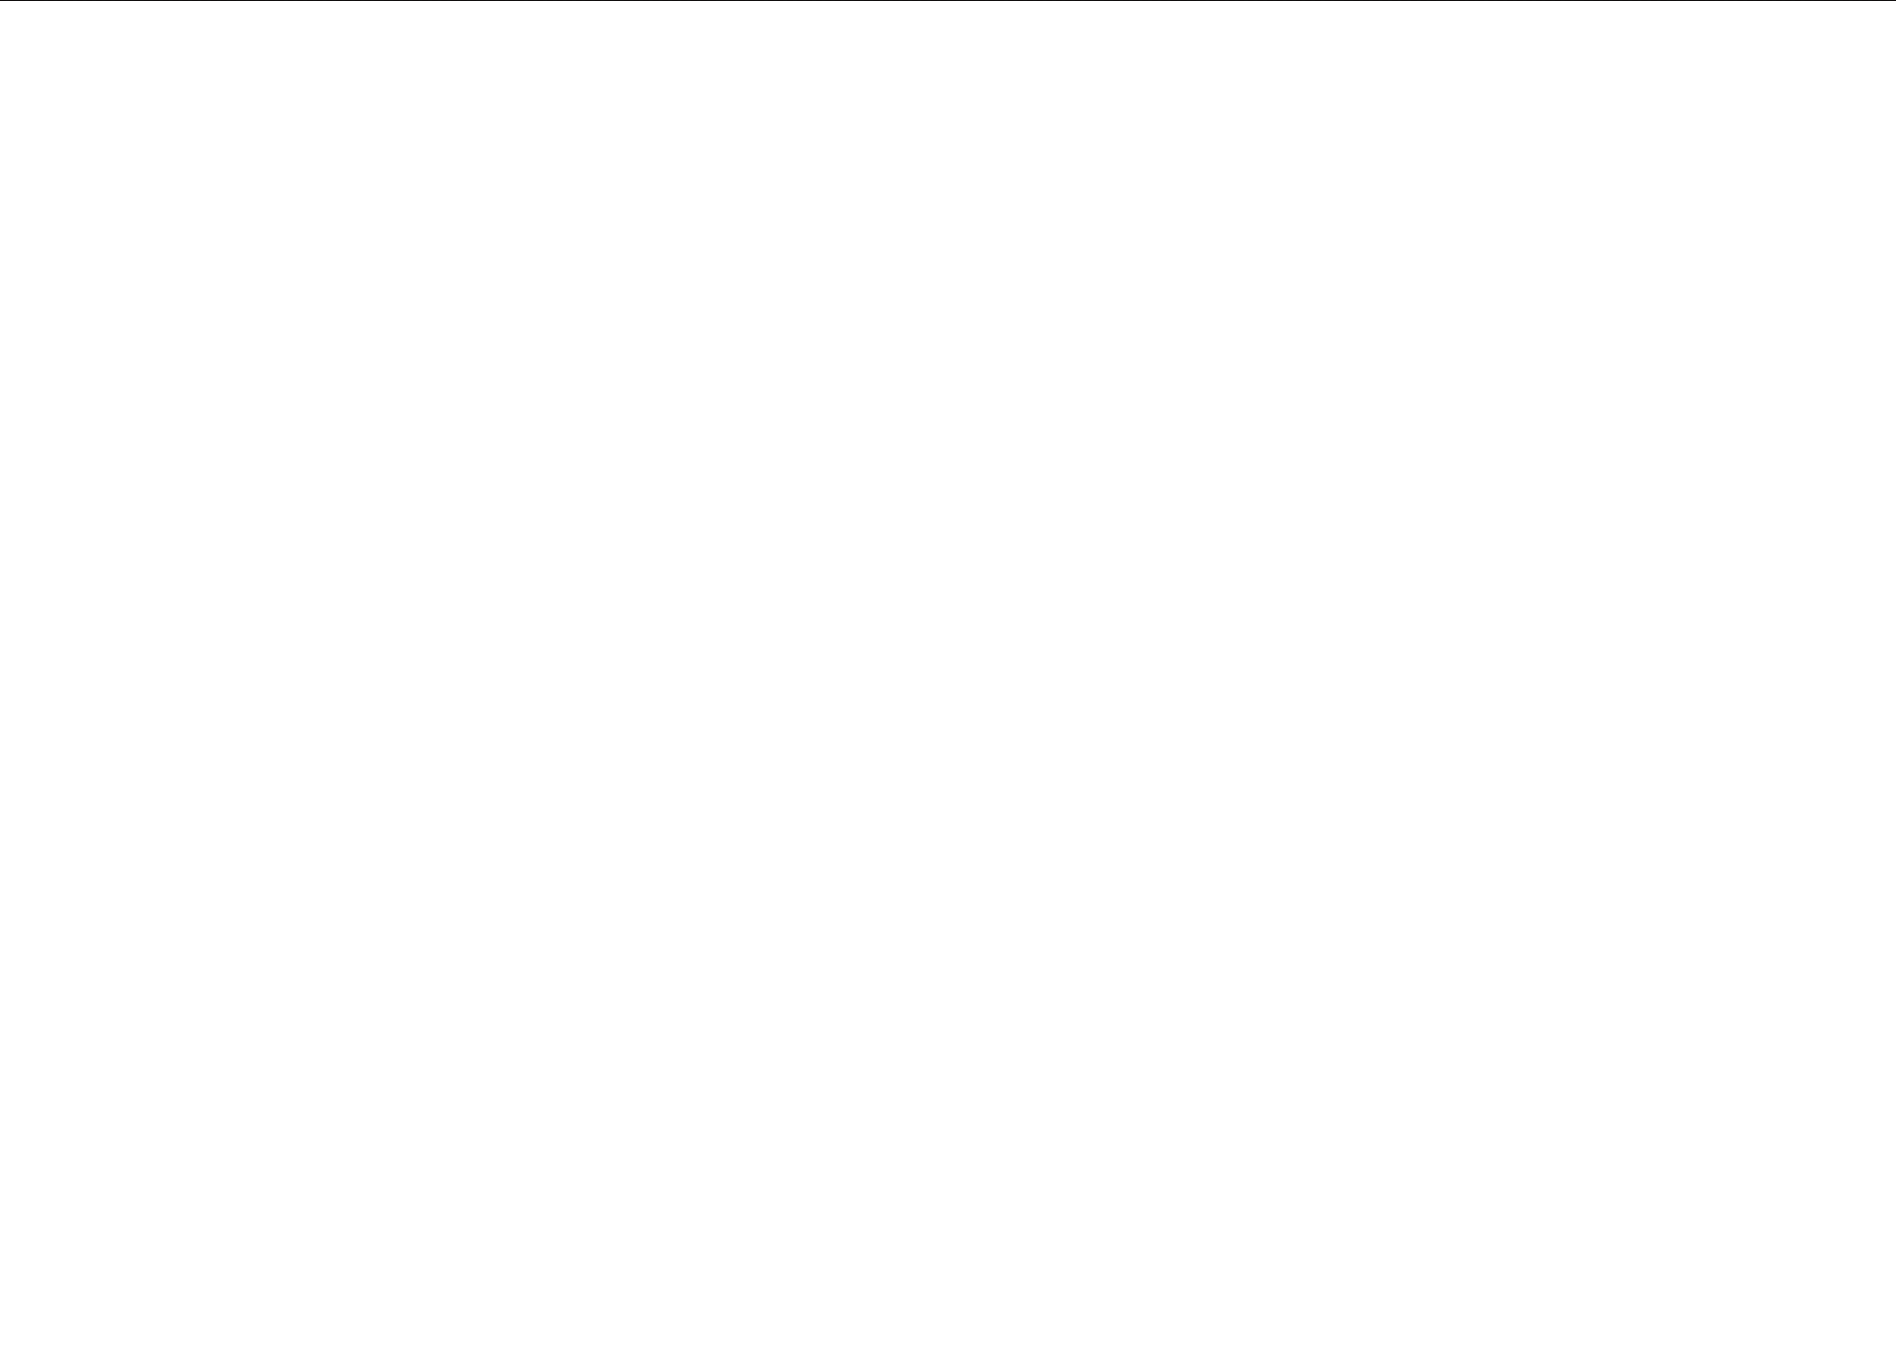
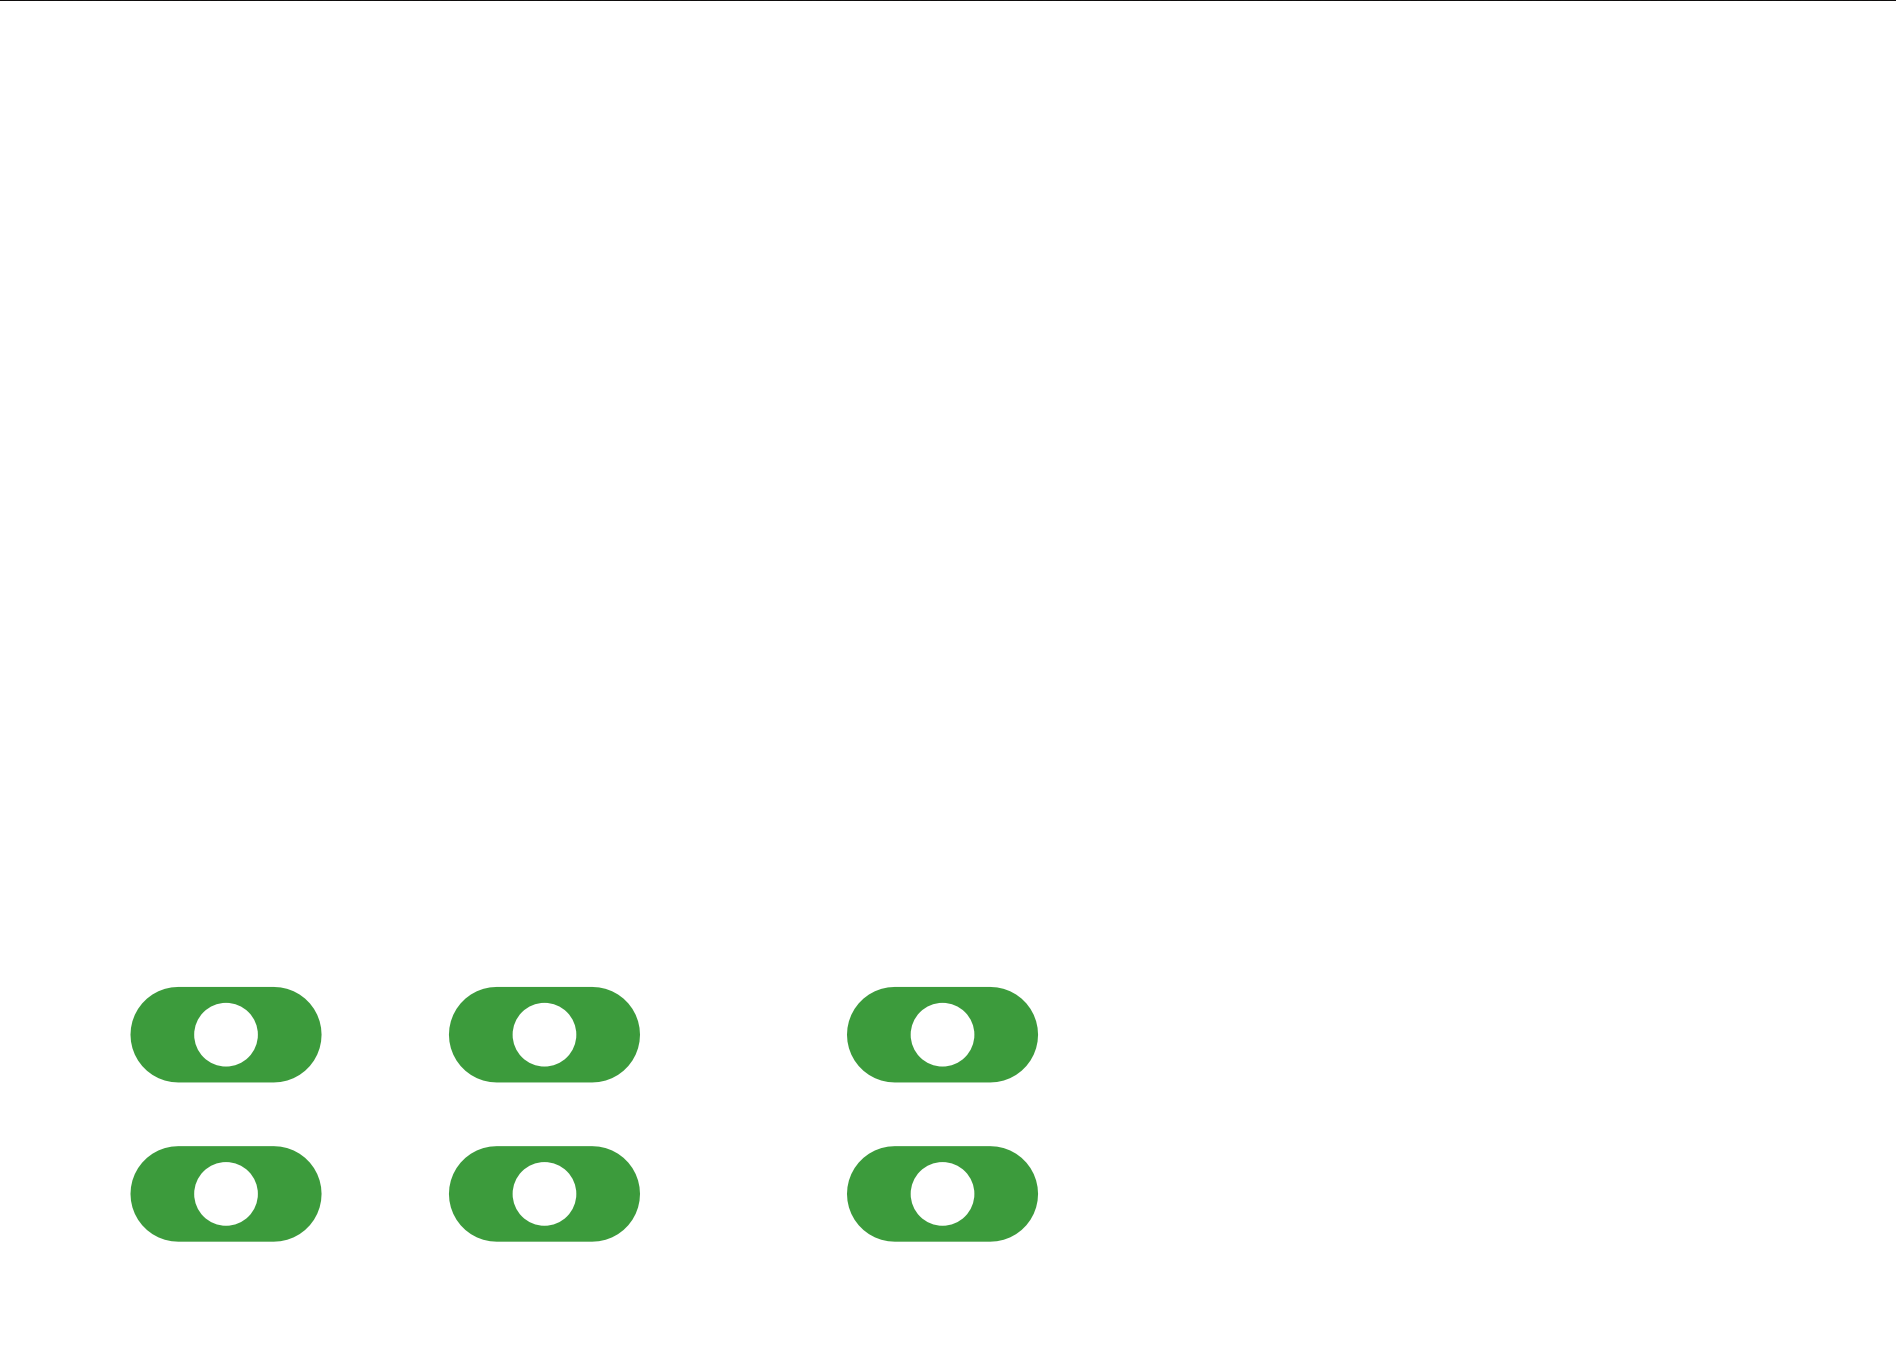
part: none -> (226, 1114)
part: none -> (544, 1114)
part: none -> (942, 1114)

